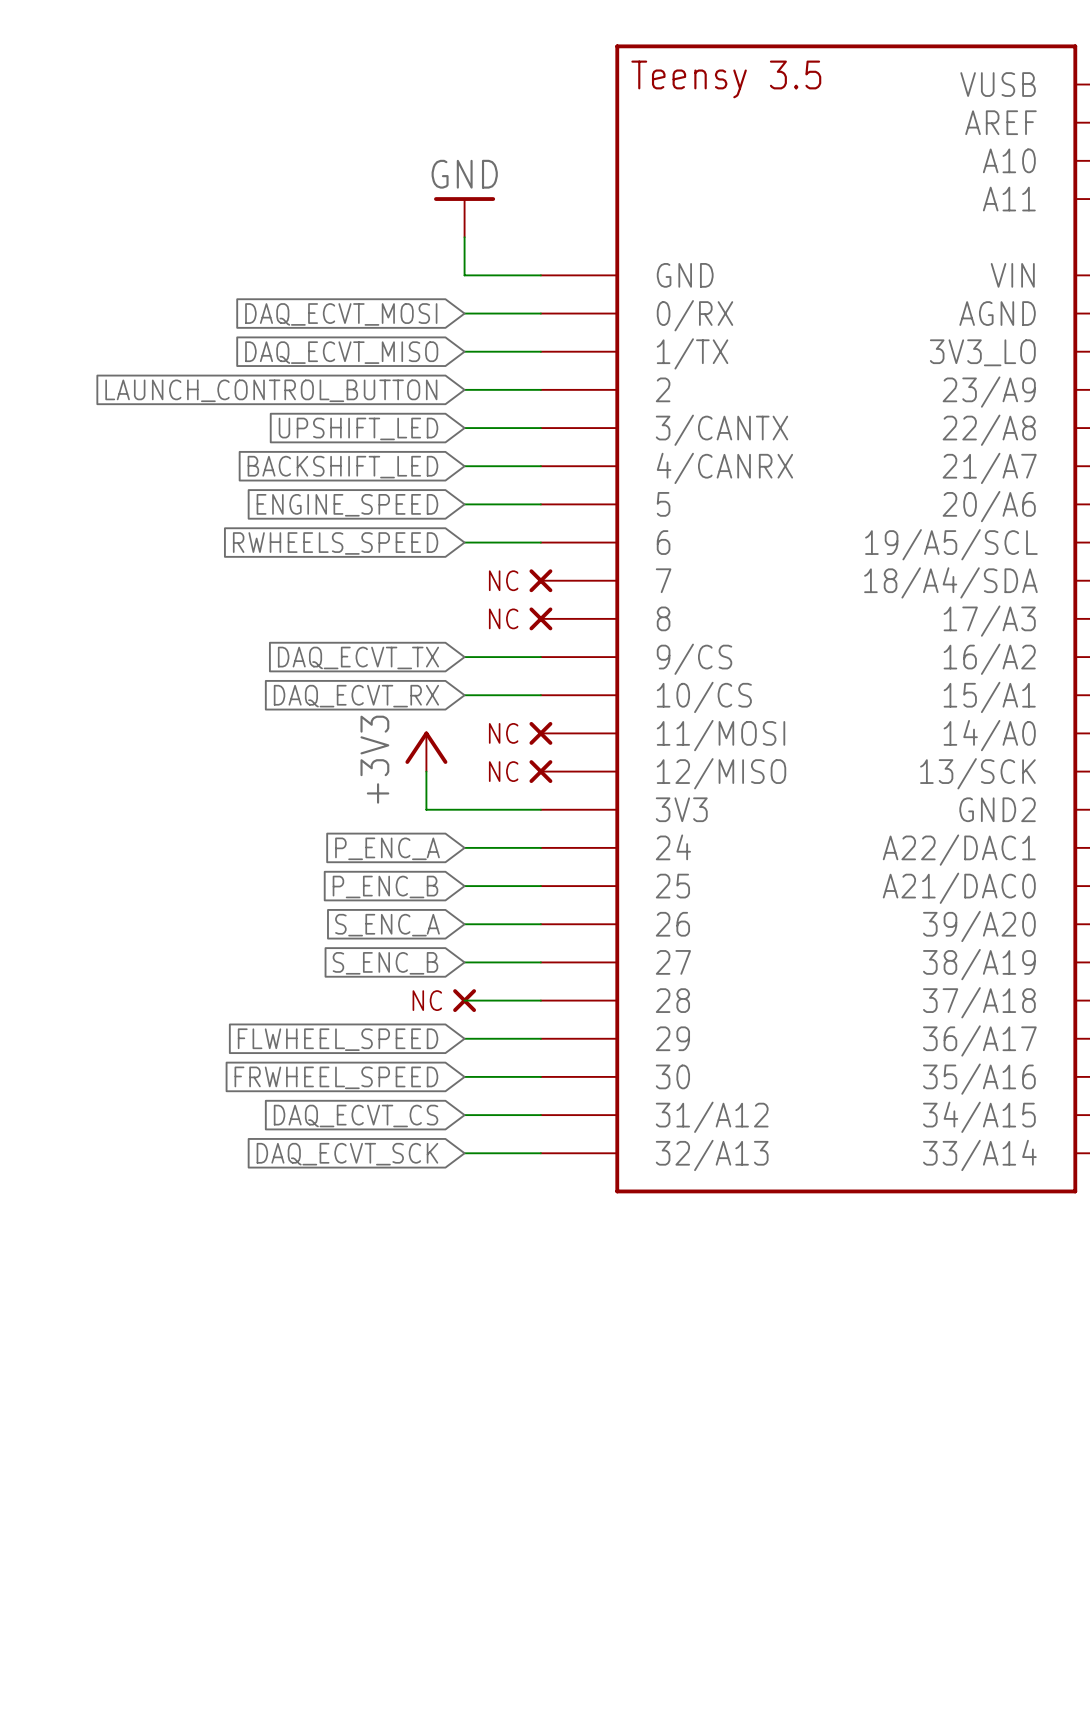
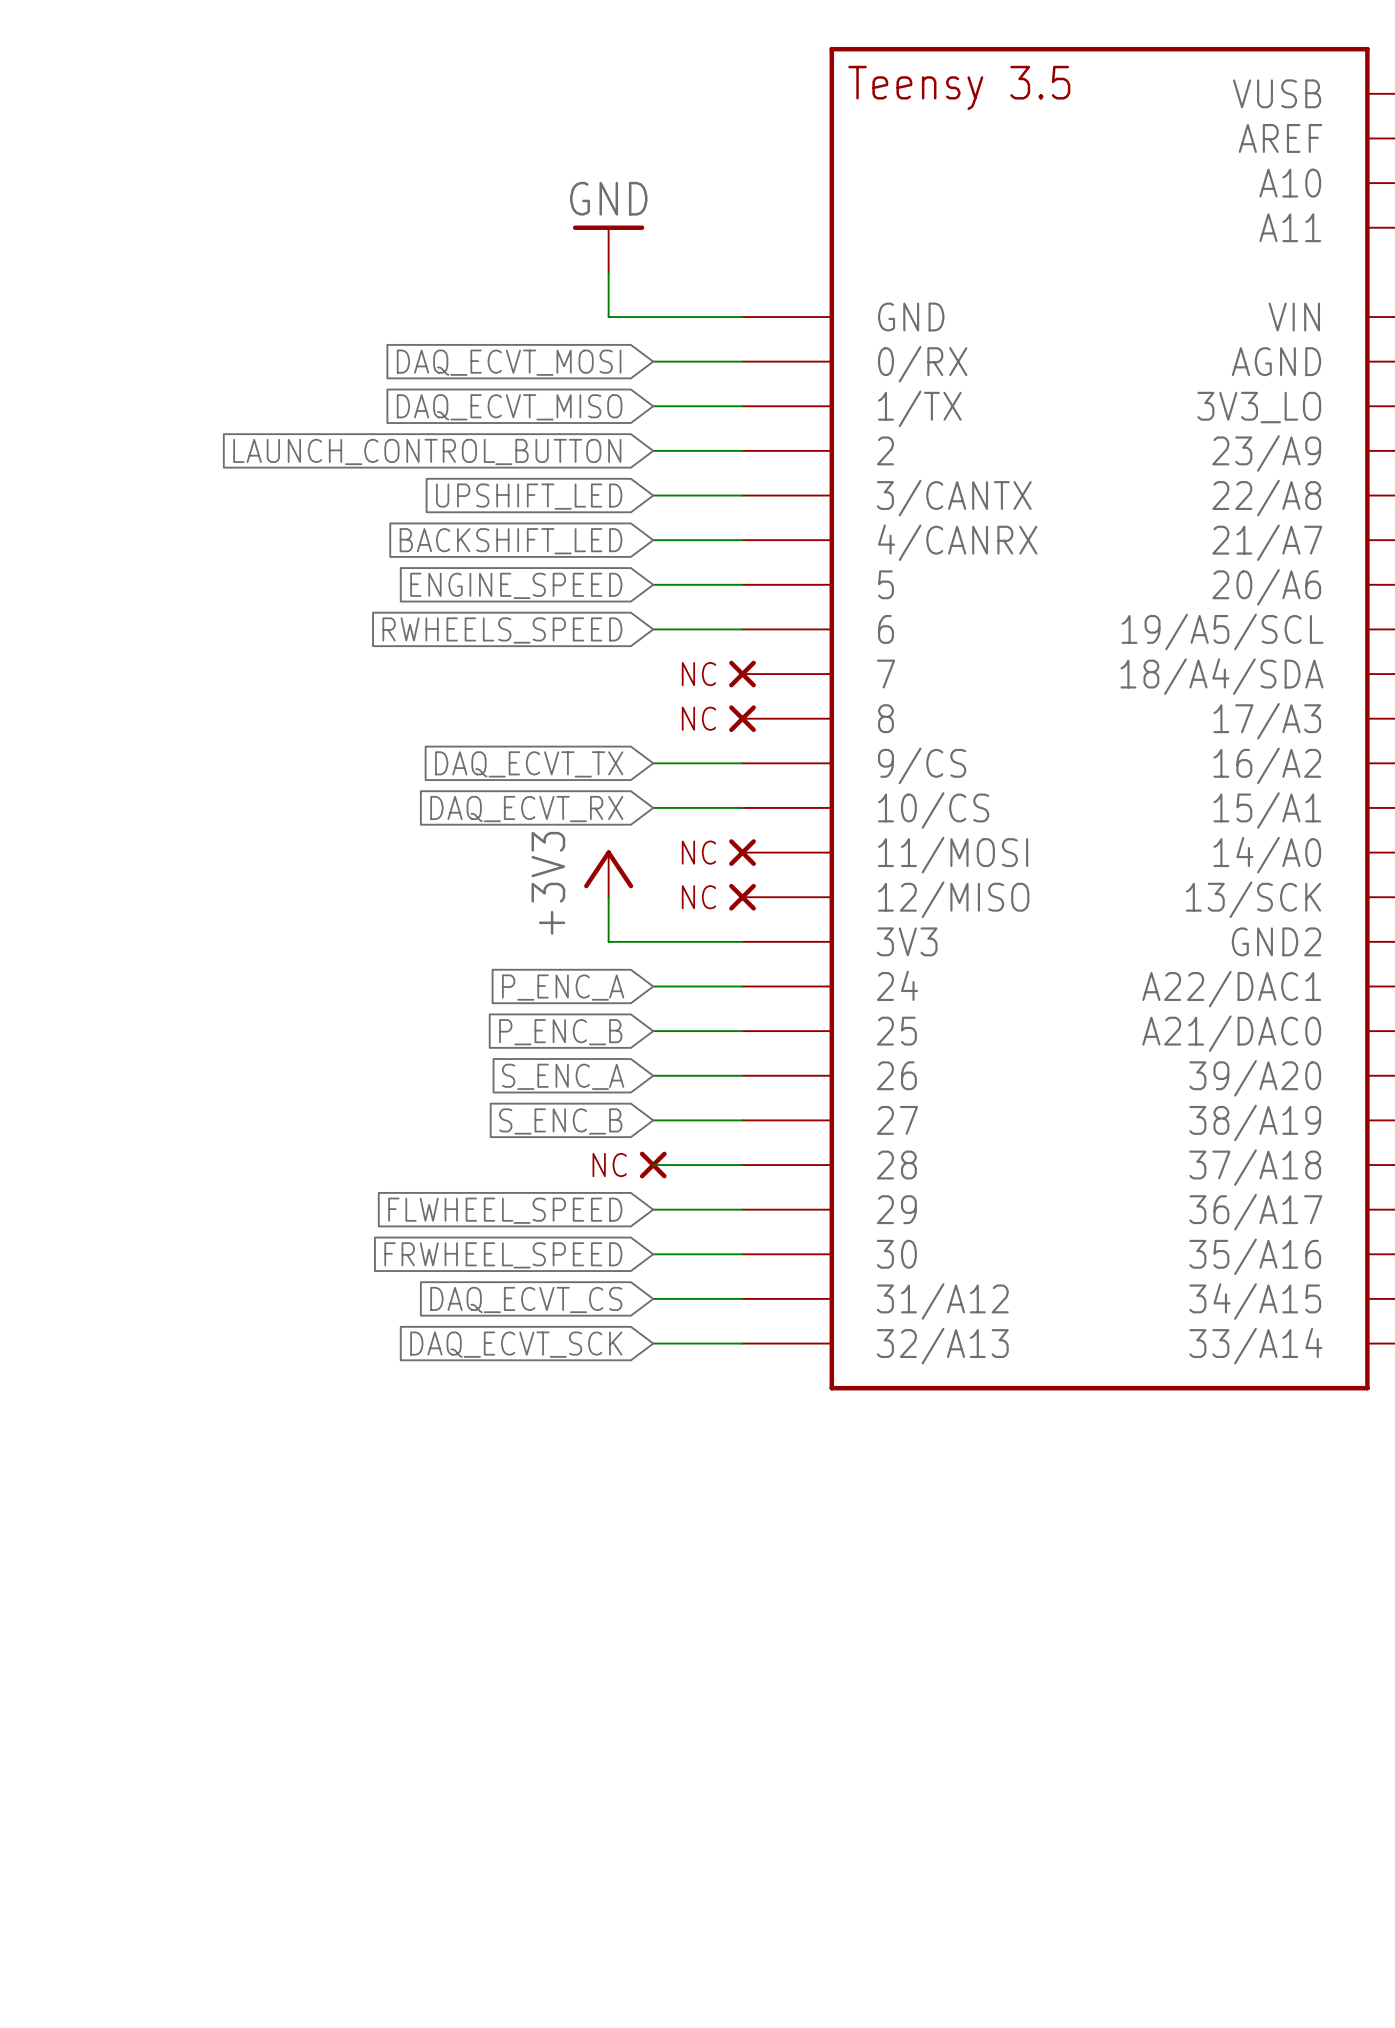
power symbol position: GND (464, 217) -> GND (608, 248)
wire: (464, 237) (464, 275) -> (608, 272) (608, 317) (653, 317)

